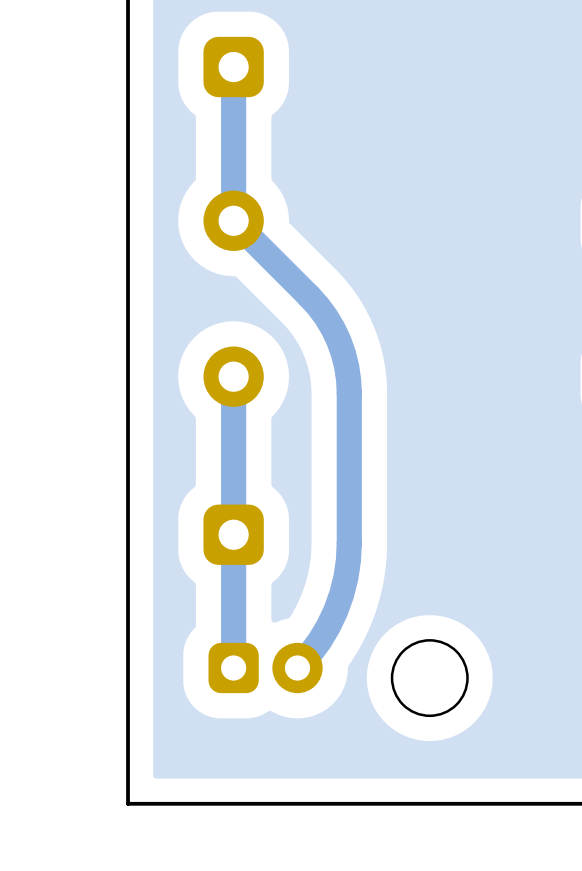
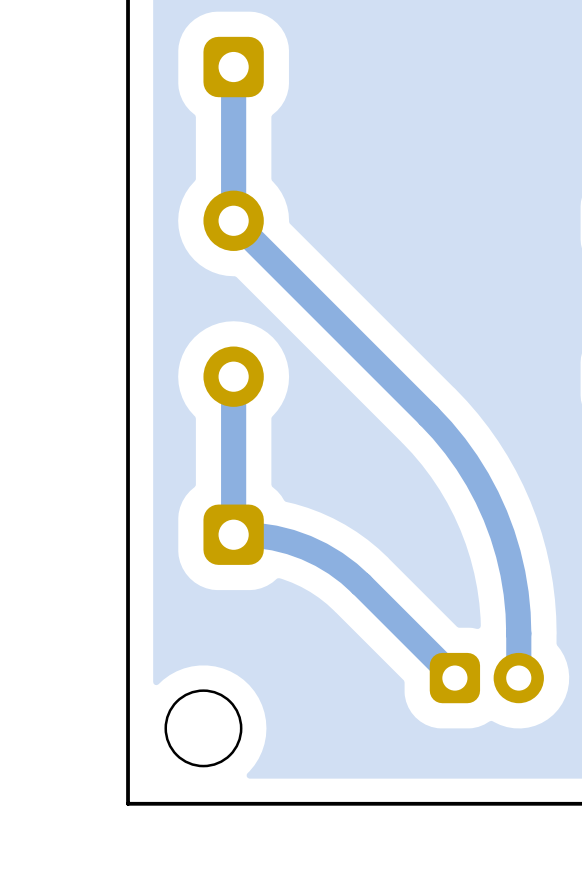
track: (308, 296) (333, 328) (346, 366) (349, 393) (349, 542) (345, 577) (335, 610) (319, 641) (297, 668) -> (308, 296) (442, 430) (477, 479) (495, 515) (512, 573) (518, 613) (518, 678)
track: (233, 534) (233, 668) -> (233, 534) (257, 535) (290, 542) (306, 547) (335, 563) (361, 584) (454, 678)
part position: (265, 668) -> (486, 678)
round board edge position: (429, 678) -> (203, 728)

